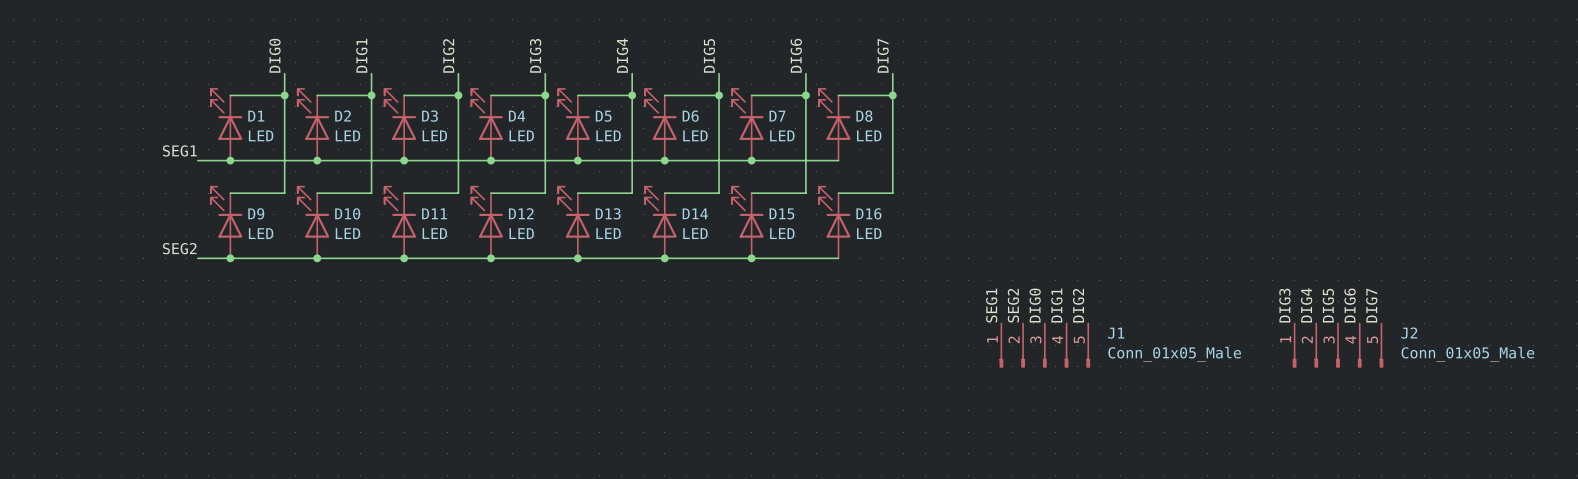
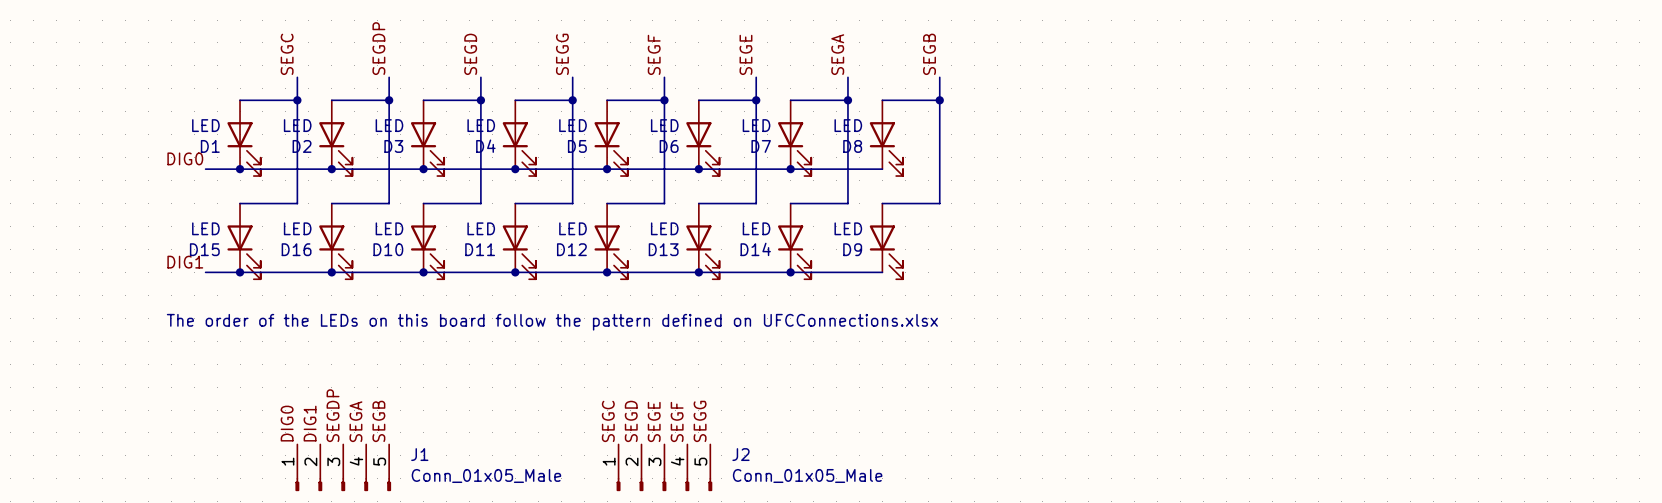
label: DIG0 (274, 55) -> SEGC (287, 54)
label: DIG1 (361, 55) -> SEGDP (378, 48)
label: DIG2 (448, 55) -> SEGD (470, 54)
label: DIG3 (535, 55) -> SEGG (562, 54)
label: DIG4 (622, 55) -> SEGF (654, 54)
label: DIG5 (709, 55) -> SEGE (745, 54)
label: DIG6 (796, 55) -> SEGA (837, 54)
label: DIG7 (883, 55) -> SEGB (929, 54)
D1 rotation: 0° (226, 114) -> 180° (244, 149)
D2 rotation: 0° (313, 114) -> 180° (335, 149)
D3 rotation: 0° (400, 114) -> 180° (427, 149)
D4 rotation: 0° (487, 114) -> 180° (519, 149)
D5 rotation: 0° (574, 114) -> 180° (611, 149)
D6 rotation: 0° (660, 114) -> 180° (702, 149)
D7 rotation: 0° (747, 114) -> 180° (794, 149)
D8 rotation: 0° (834, 114) -> 180° (886, 149)
label: SEG1 (179, 150) -> DIG0 (185, 158)
D9 rotation: 0° (226, 212) -> 180° (886, 252)
D10 rotation: 0° (313, 212) -> 180° (427, 252)
D11 rotation: 0° (400, 212) -> 180° (519, 252)
D12 rotation: 0° (487, 212) -> 180° (611, 252)
D13 rotation: 0° (574, 212) -> 180° (702, 252)
D14 rotation: 0° (660, 212) -> 180° (794, 252)
D15 rotation: 0° (747, 212) -> 180° (244, 252)
D16 rotation: 0° (834, 212) -> 180° (335, 252)
D9 position: (226, 222) -> (886, 241)
D10 position: (313, 222) -> (427, 241)
D11 position: (400, 222) -> (519, 241)
D12 position: (487, 222) -> (611, 241)
D13 position: (574, 222) -> (702, 241)
D14 position: (660, 222) -> (794, 241)
D15 position: (747, 222) -> (244, 241)
D16 position: (834, 222) -> (335, 241)
label: SEG2 (179, 248) -> DIG1 (185, 262)
text: none -> The order of the LEDs on this board follow the pattern defined on UFCConnections.xlsx (552, 322)
label: SEG1 (991, 305) -> none
label: SEG2 (1013, 305) -> none
label: DIG0 (1035, 305) -> none
label: DIG1 (1056, 305) -> none
label: DIG2 (1078, 305) -> none
label: DIG3 (1284, 305) -> none
label: DIG4 (1306, 305) -> none
label: DIG5 (1328, 305) -> none
label: DIG6 (1350, 305) -> none
label: DIG7 (1371, 305) -> none
J1 position: (1044, 345) -> (343, 467)
J2 position: (1338, 345) -> (664, 467)
label: none -> SEGDP (333, 415)
label: none -> SEGA (355, 421)
label: none -> DIG0 (287, 423)
label: none -> DIG1 (310, 423)
label: none -> SEGB (378, 421)
label: none -> SEGC (608, 421)
label: none -> SEGD (631, 421)
label: none -> SEGE (654, 421)
label: none -> SEGF (677, 421)
label: none -> SEGG (700, 421)

